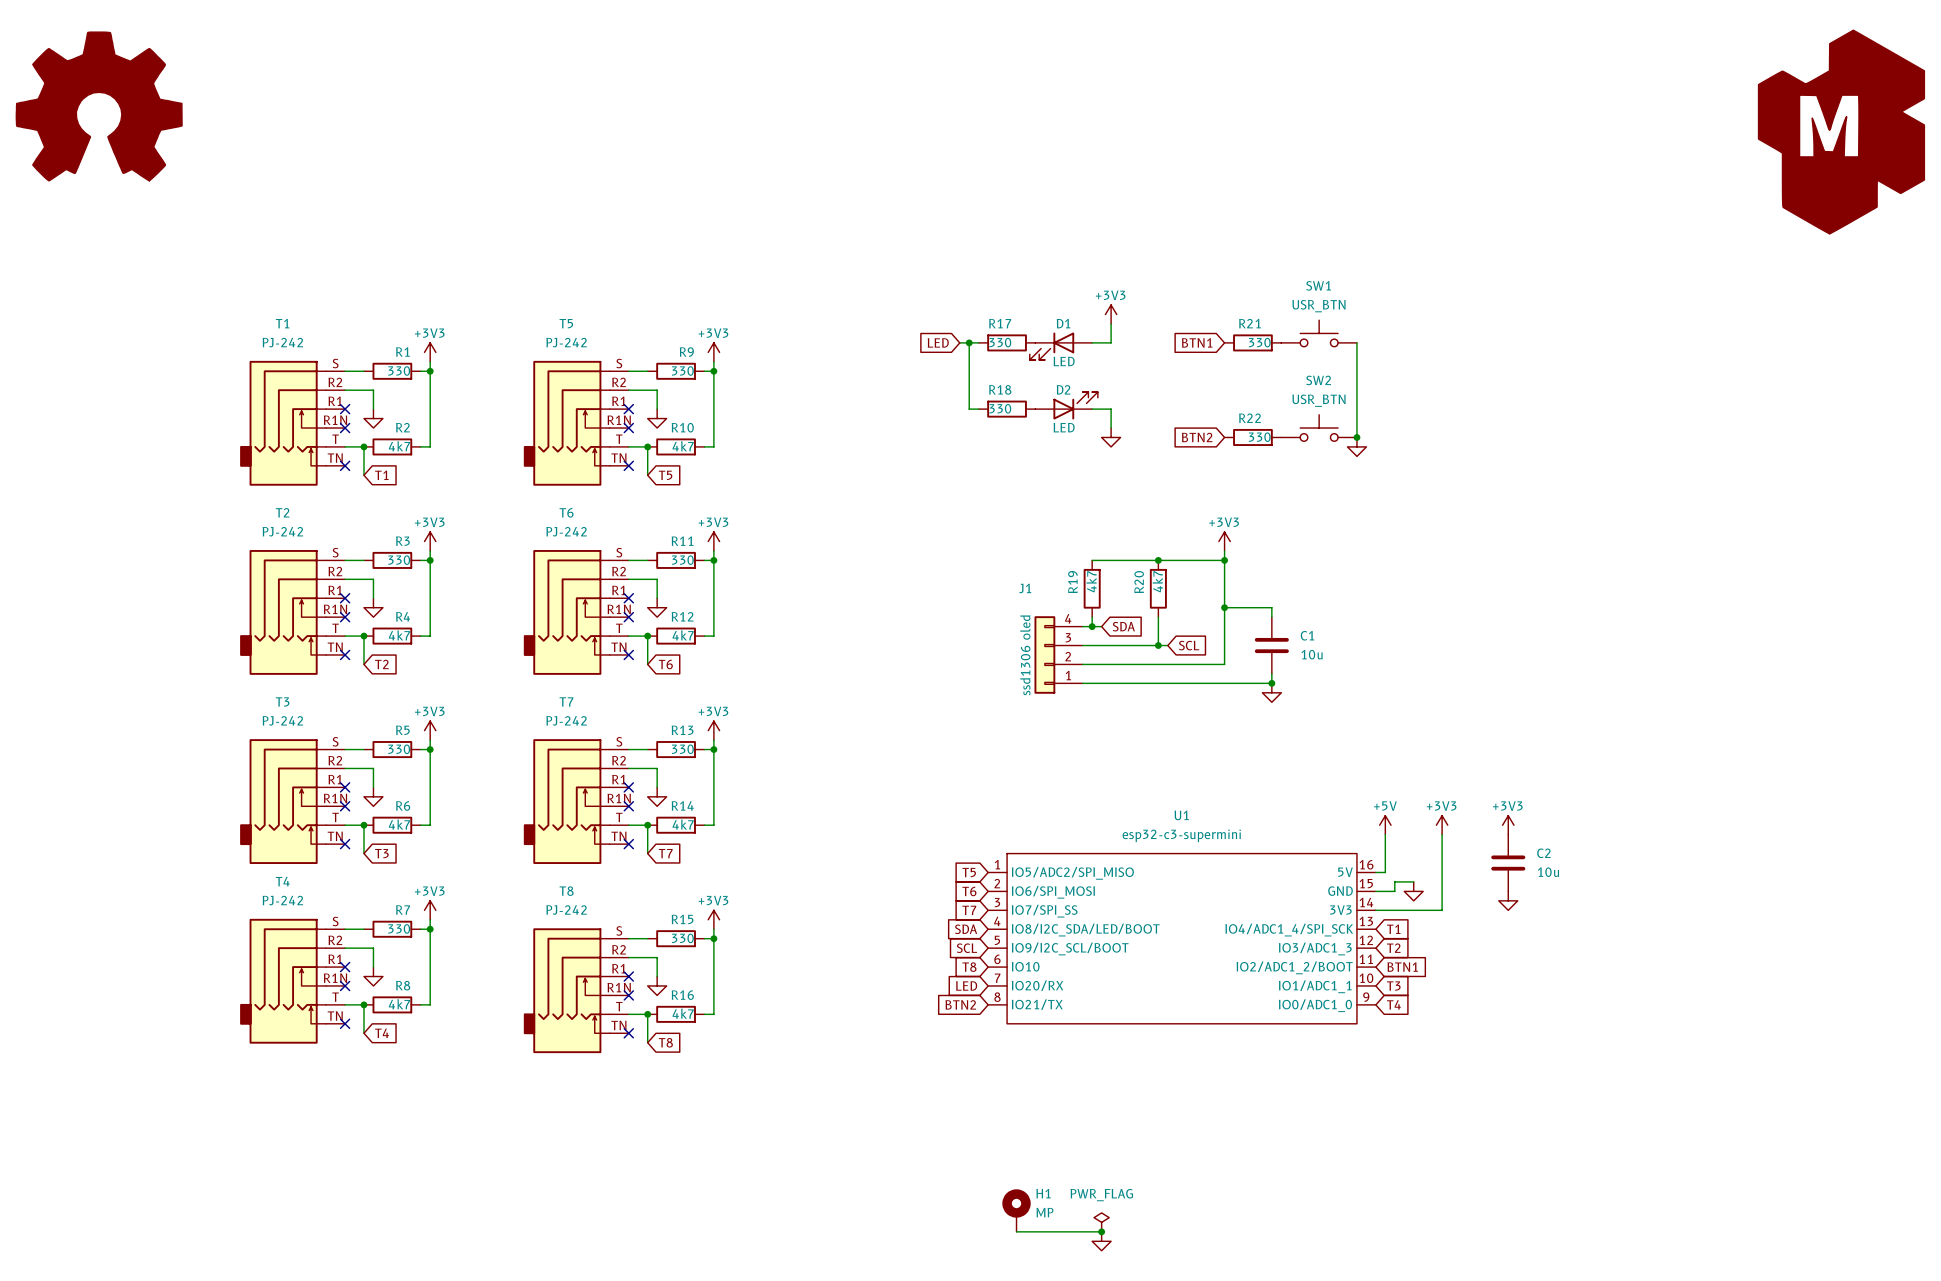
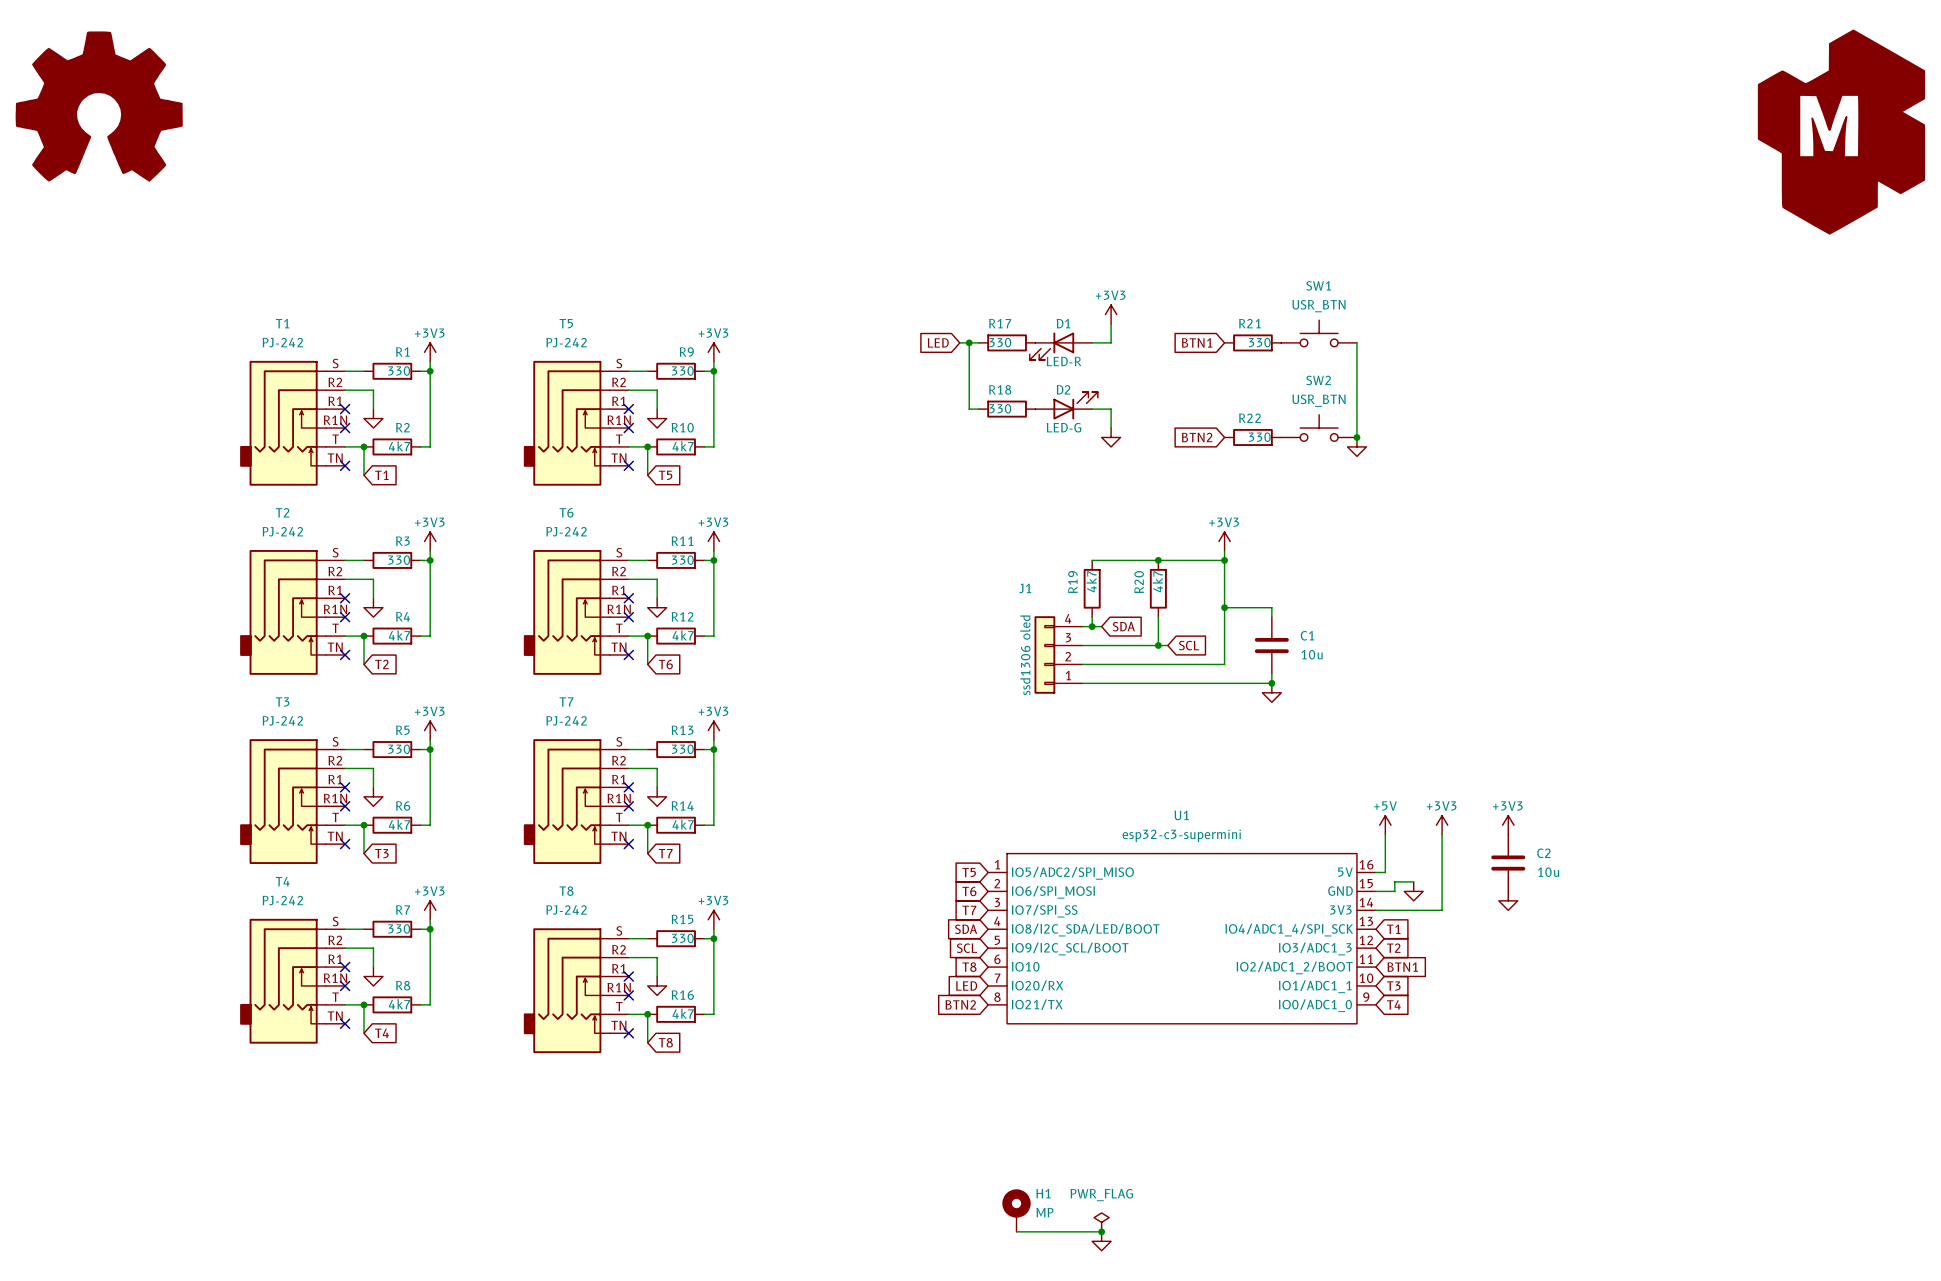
D1 value: LED (1064, 361) -> LED-R (1064, 361)
D2 value: LED (1064, 427) -> LED-G (1063, 427)

